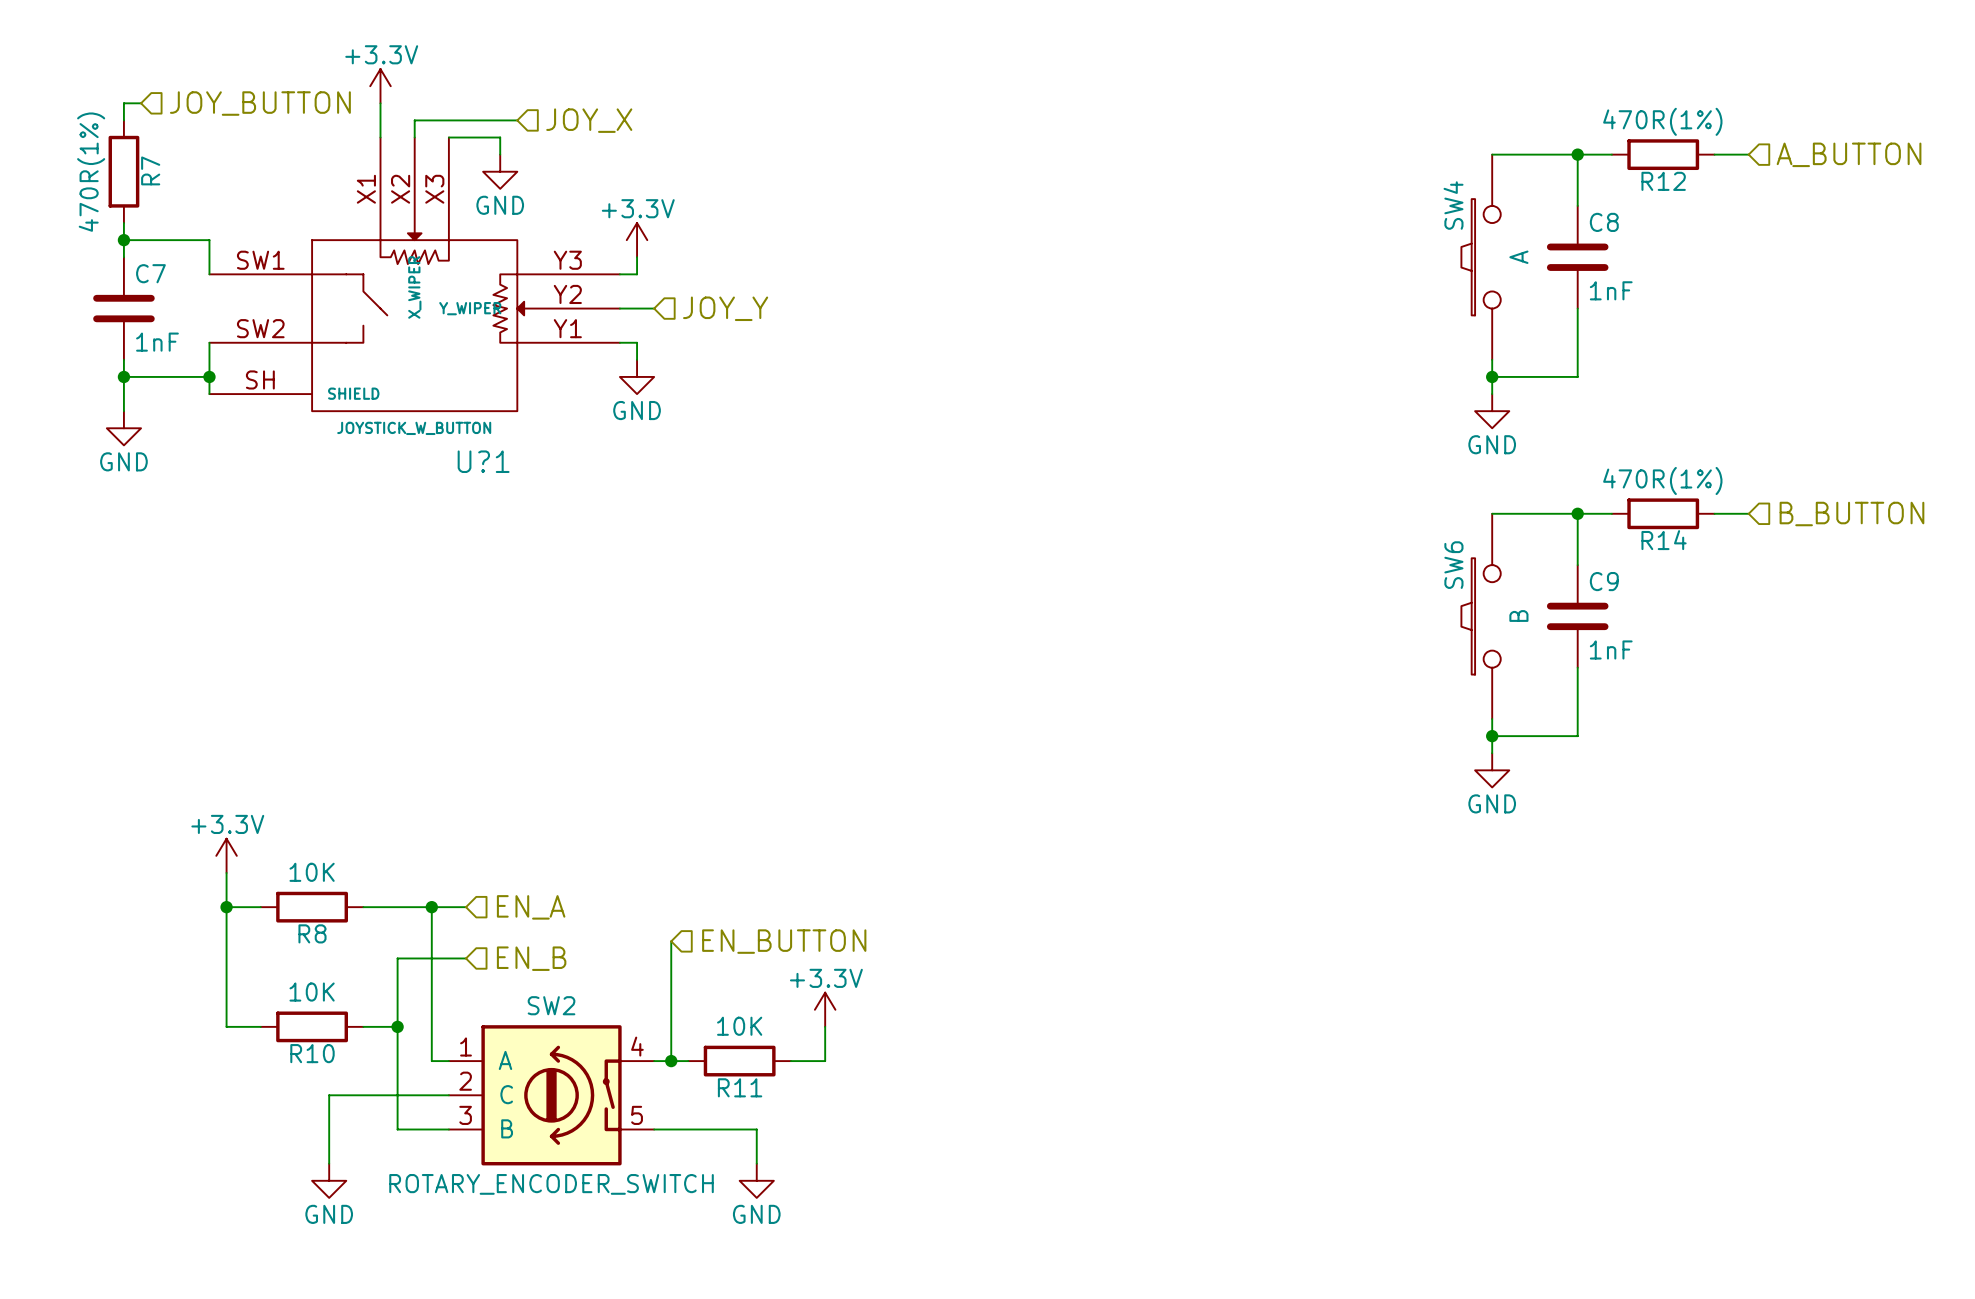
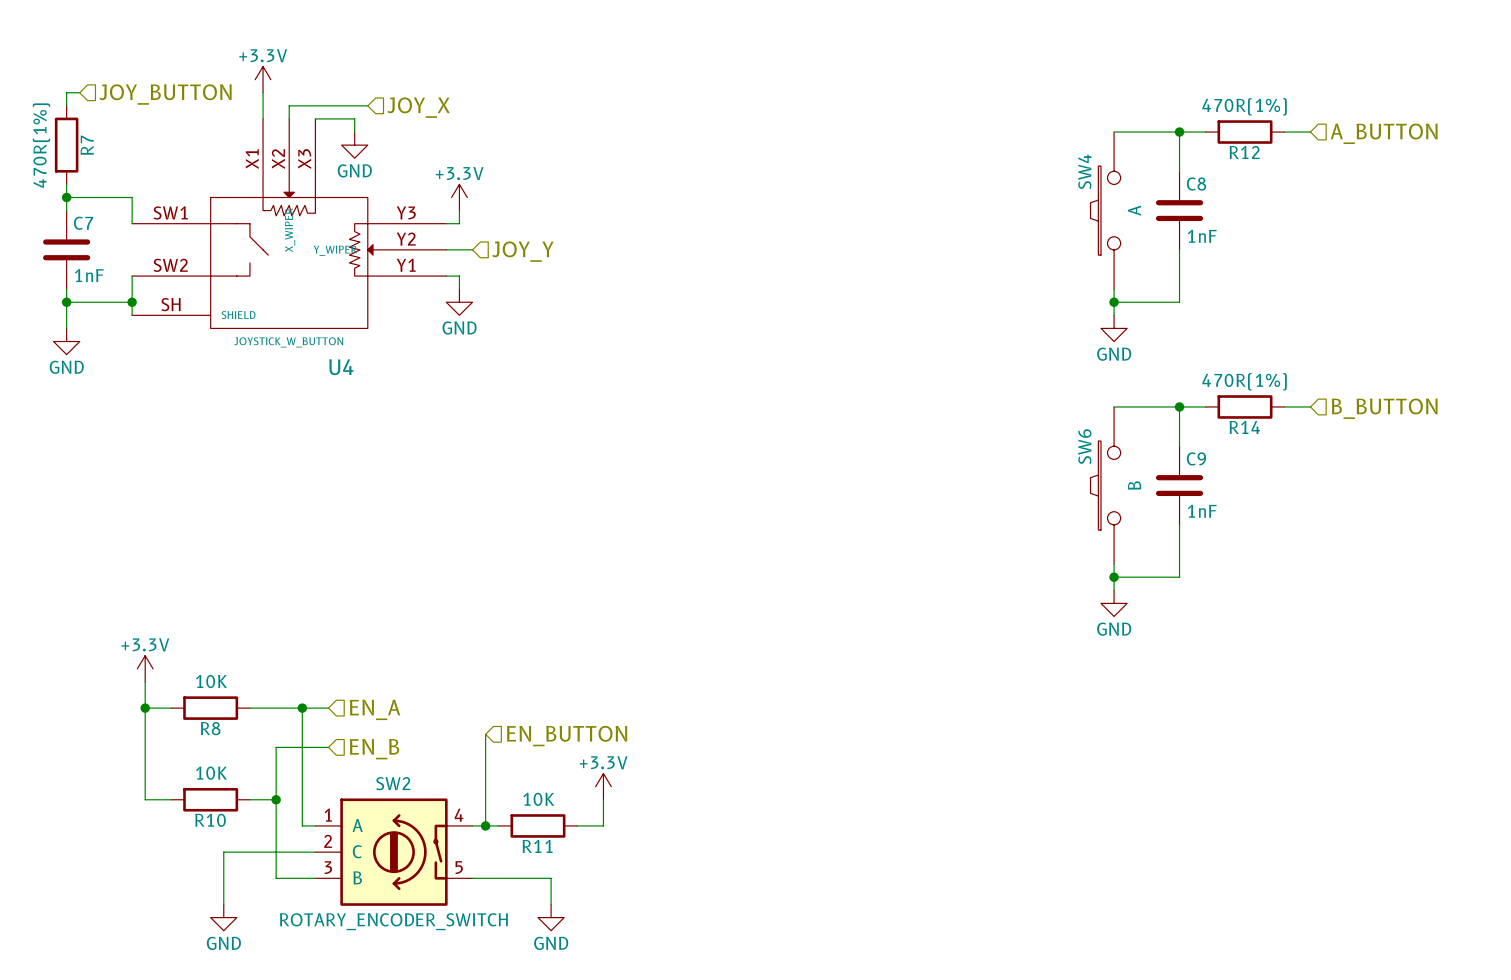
U?1 name: U?1 (483, 461) -> U4 (341, 367)

